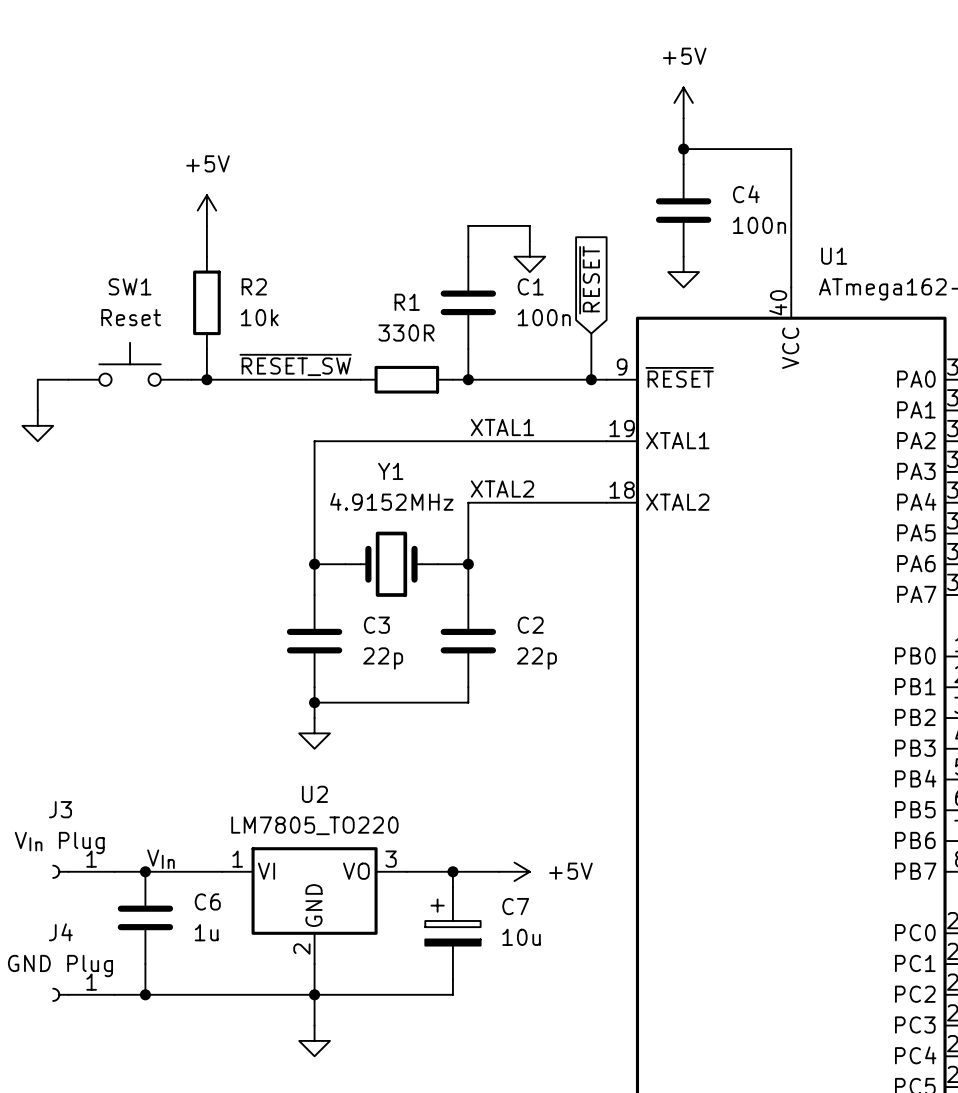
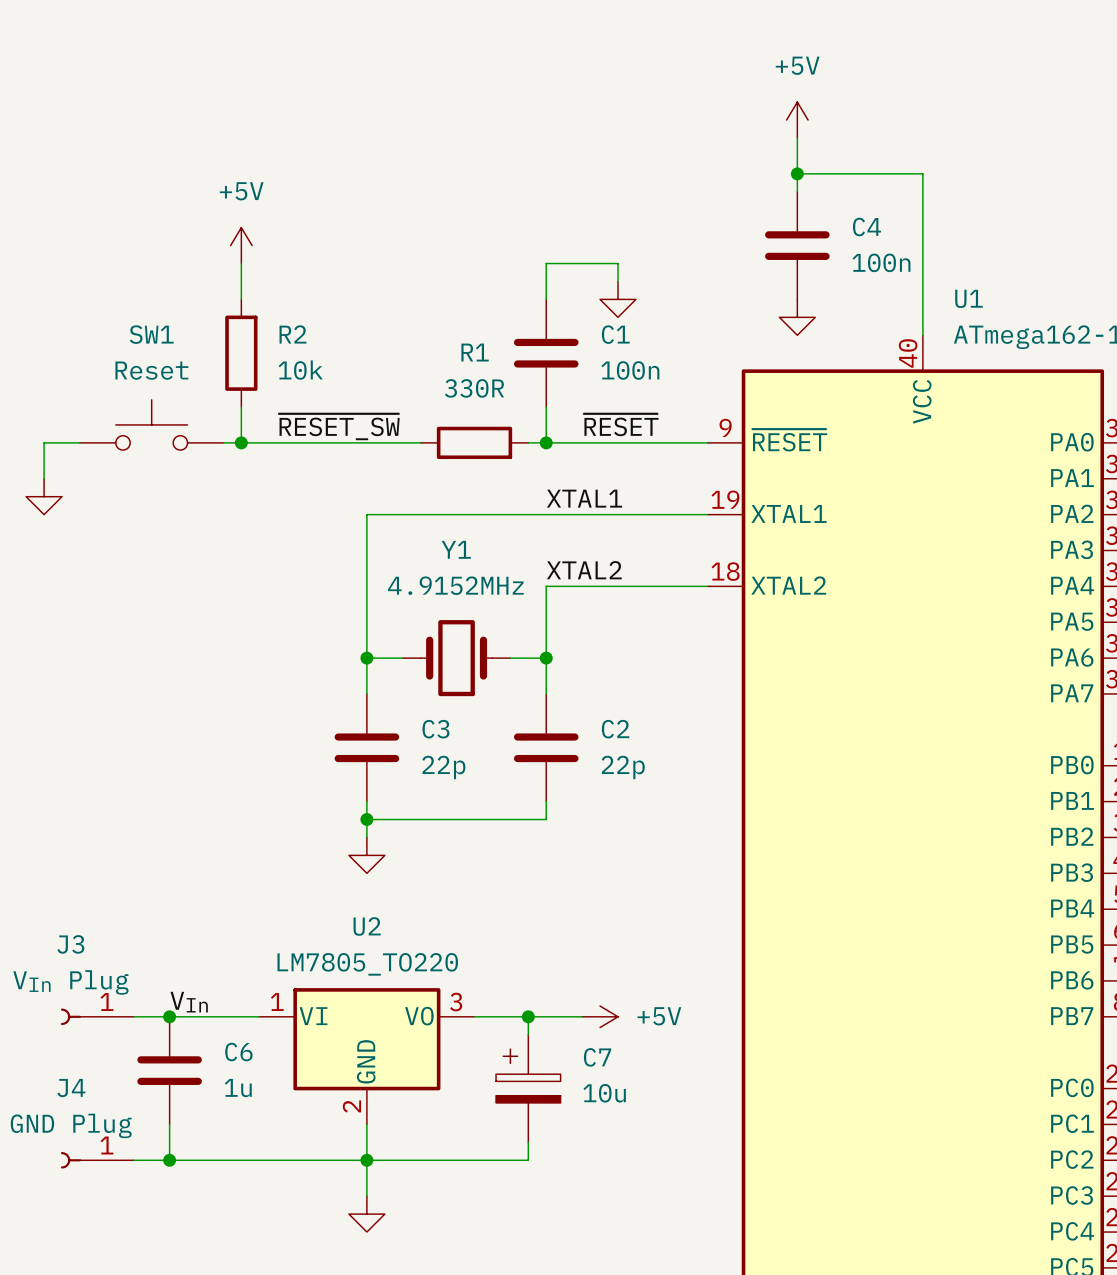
global label: ~{RESET} (589, 280) -> none
wire: (591, 333) (591, 379) -> none
label: none -> ~{RESET} (621, 424)
junction: (591, 379) -> none

